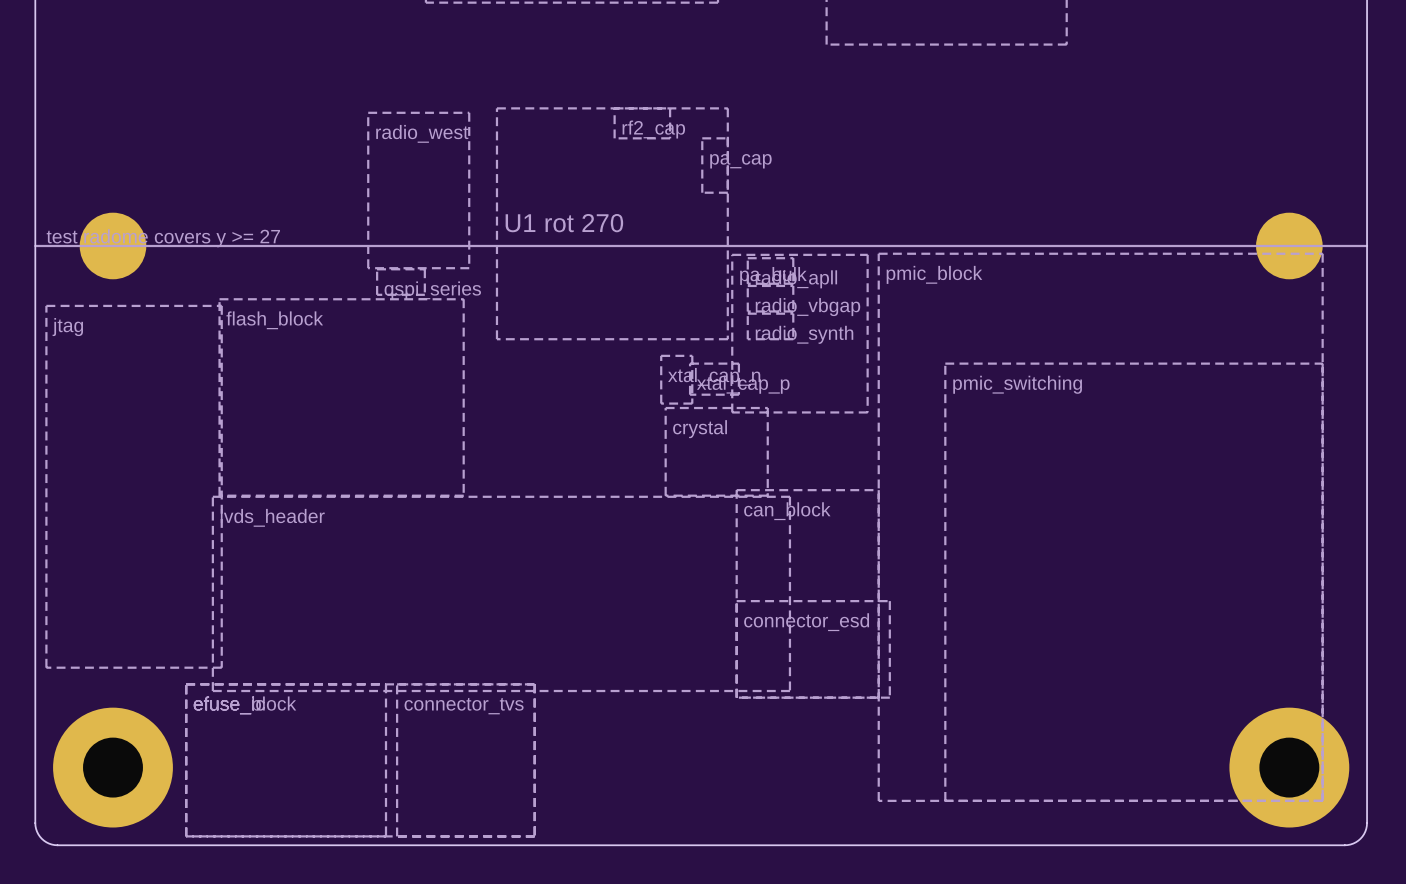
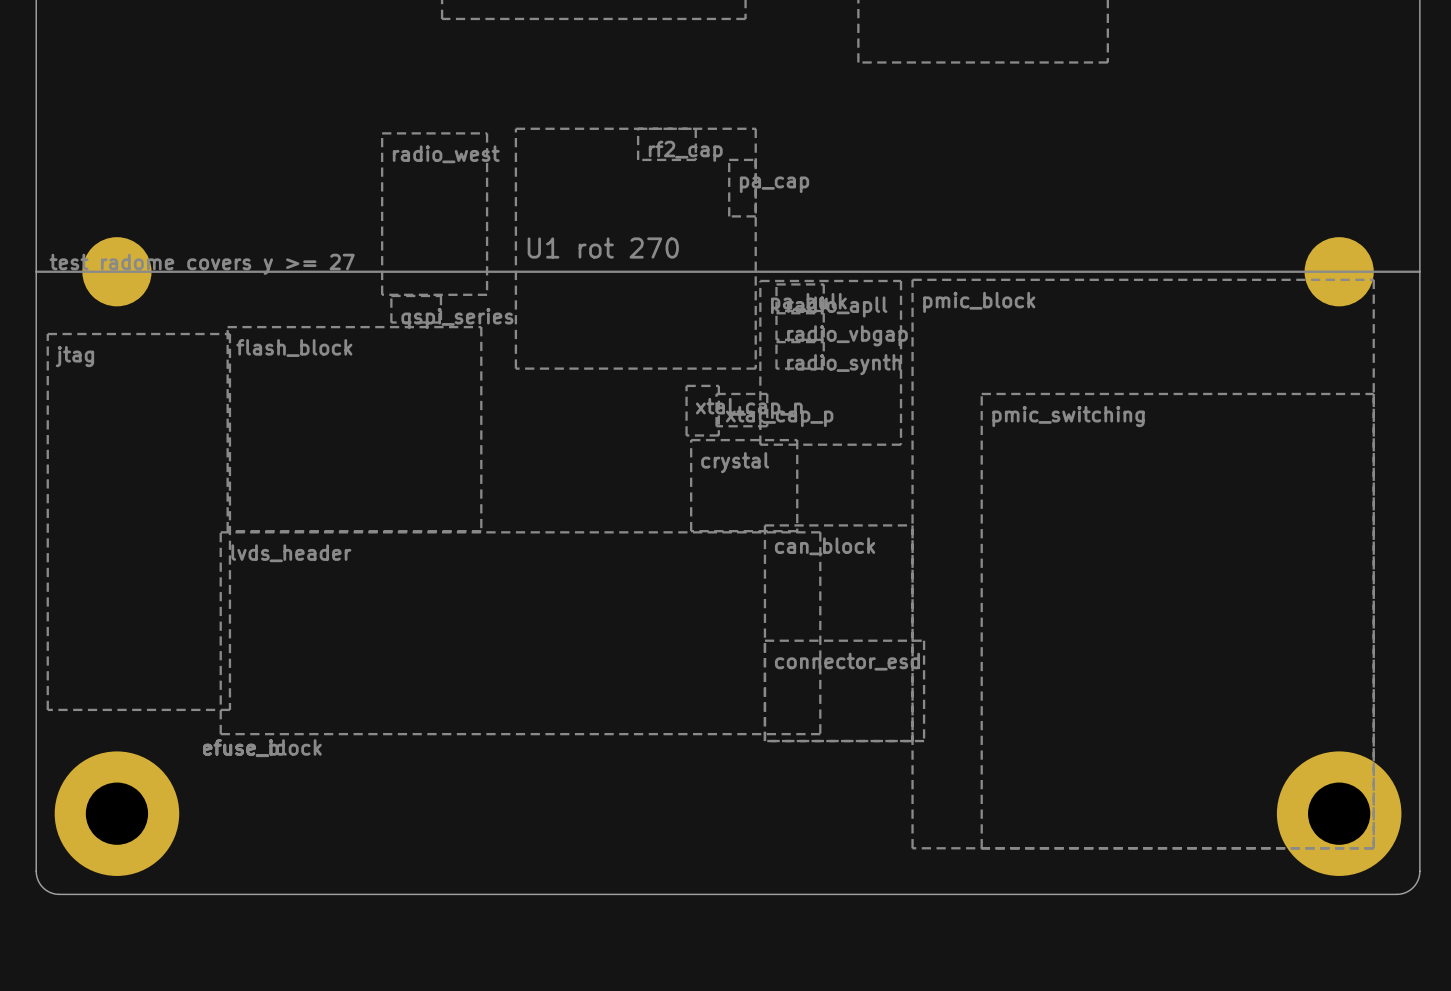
line: (186, 684) (534, 684) (534, 836) (186, 836) (186, 684) -> none
line: (386, 684) (386, 836) -> none
line: (397, 684) (397, 836) -> none
text: connector_tvs (464, 706) -> none

